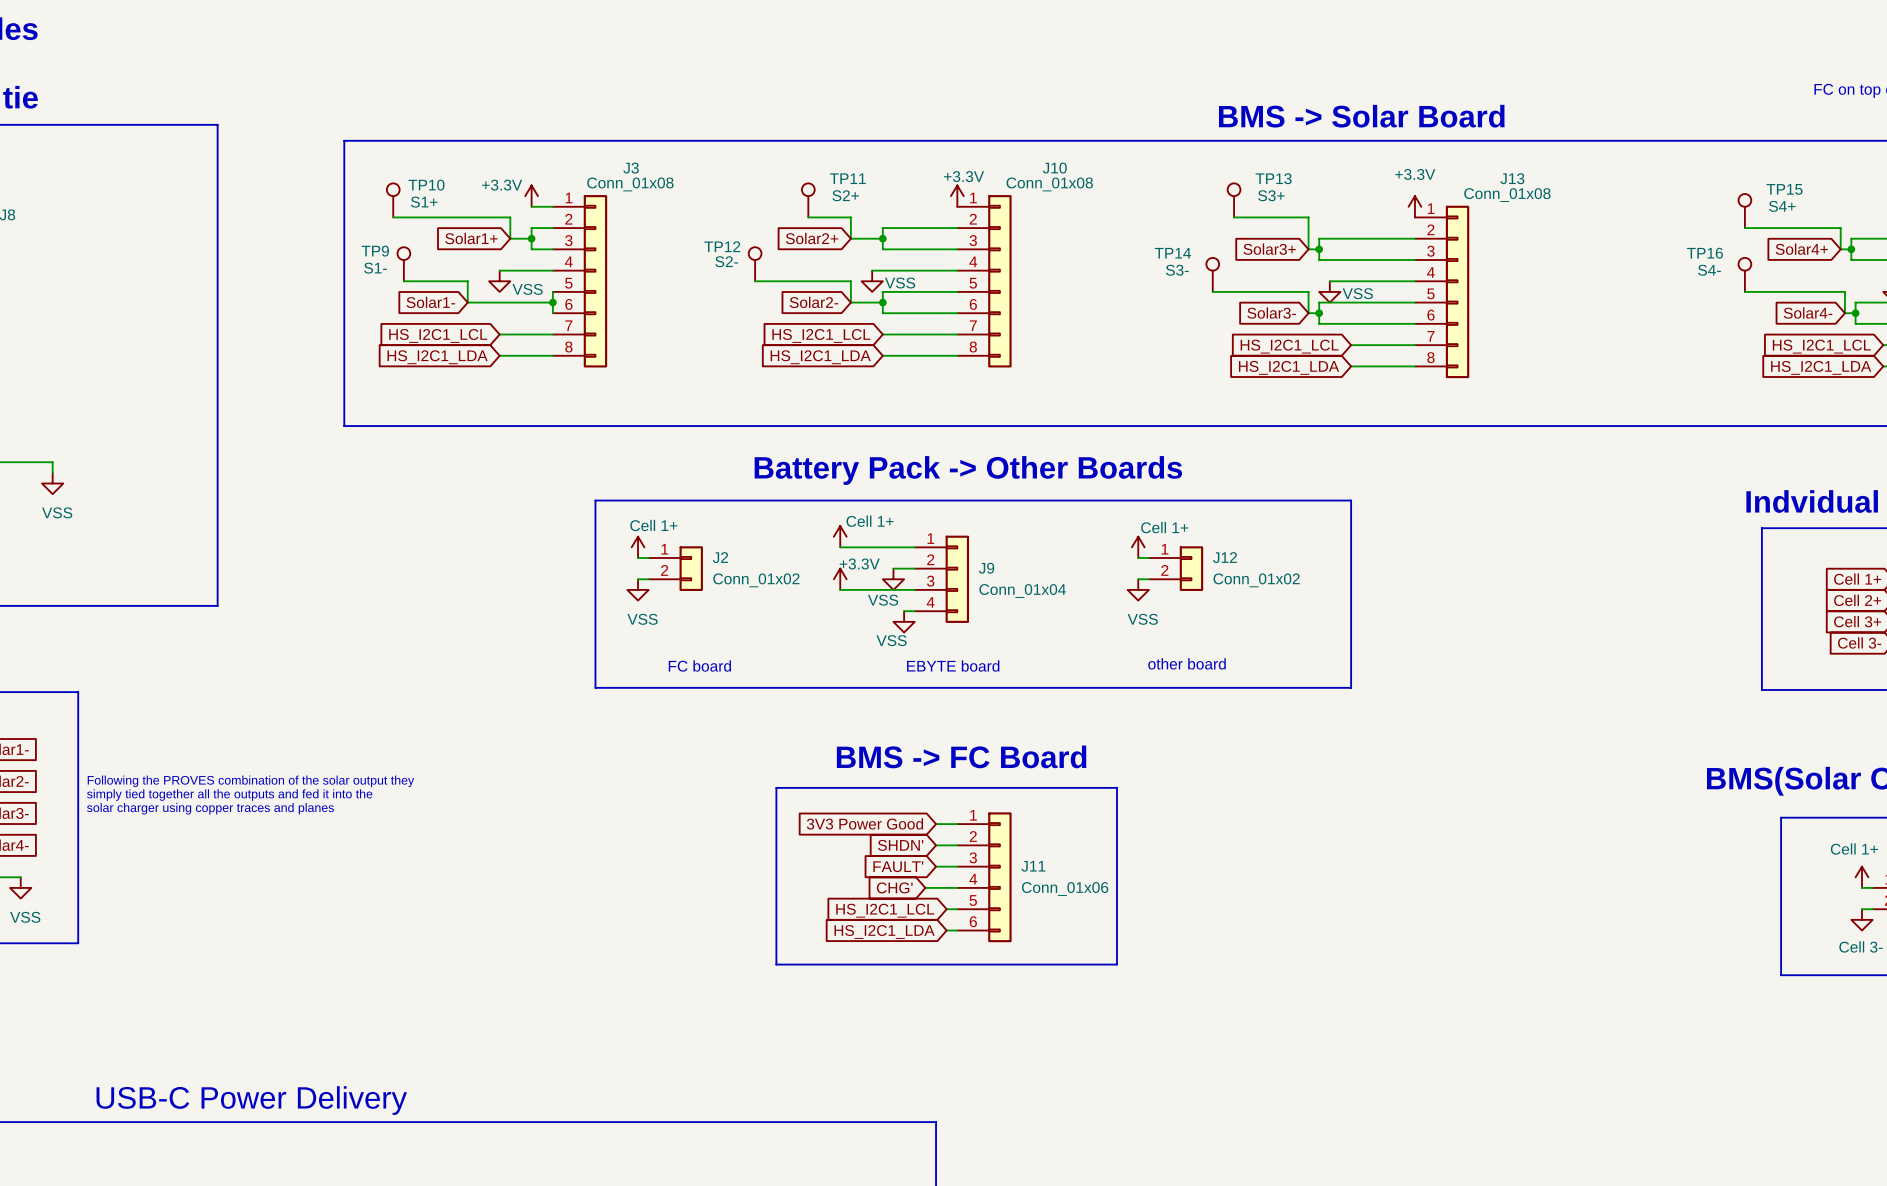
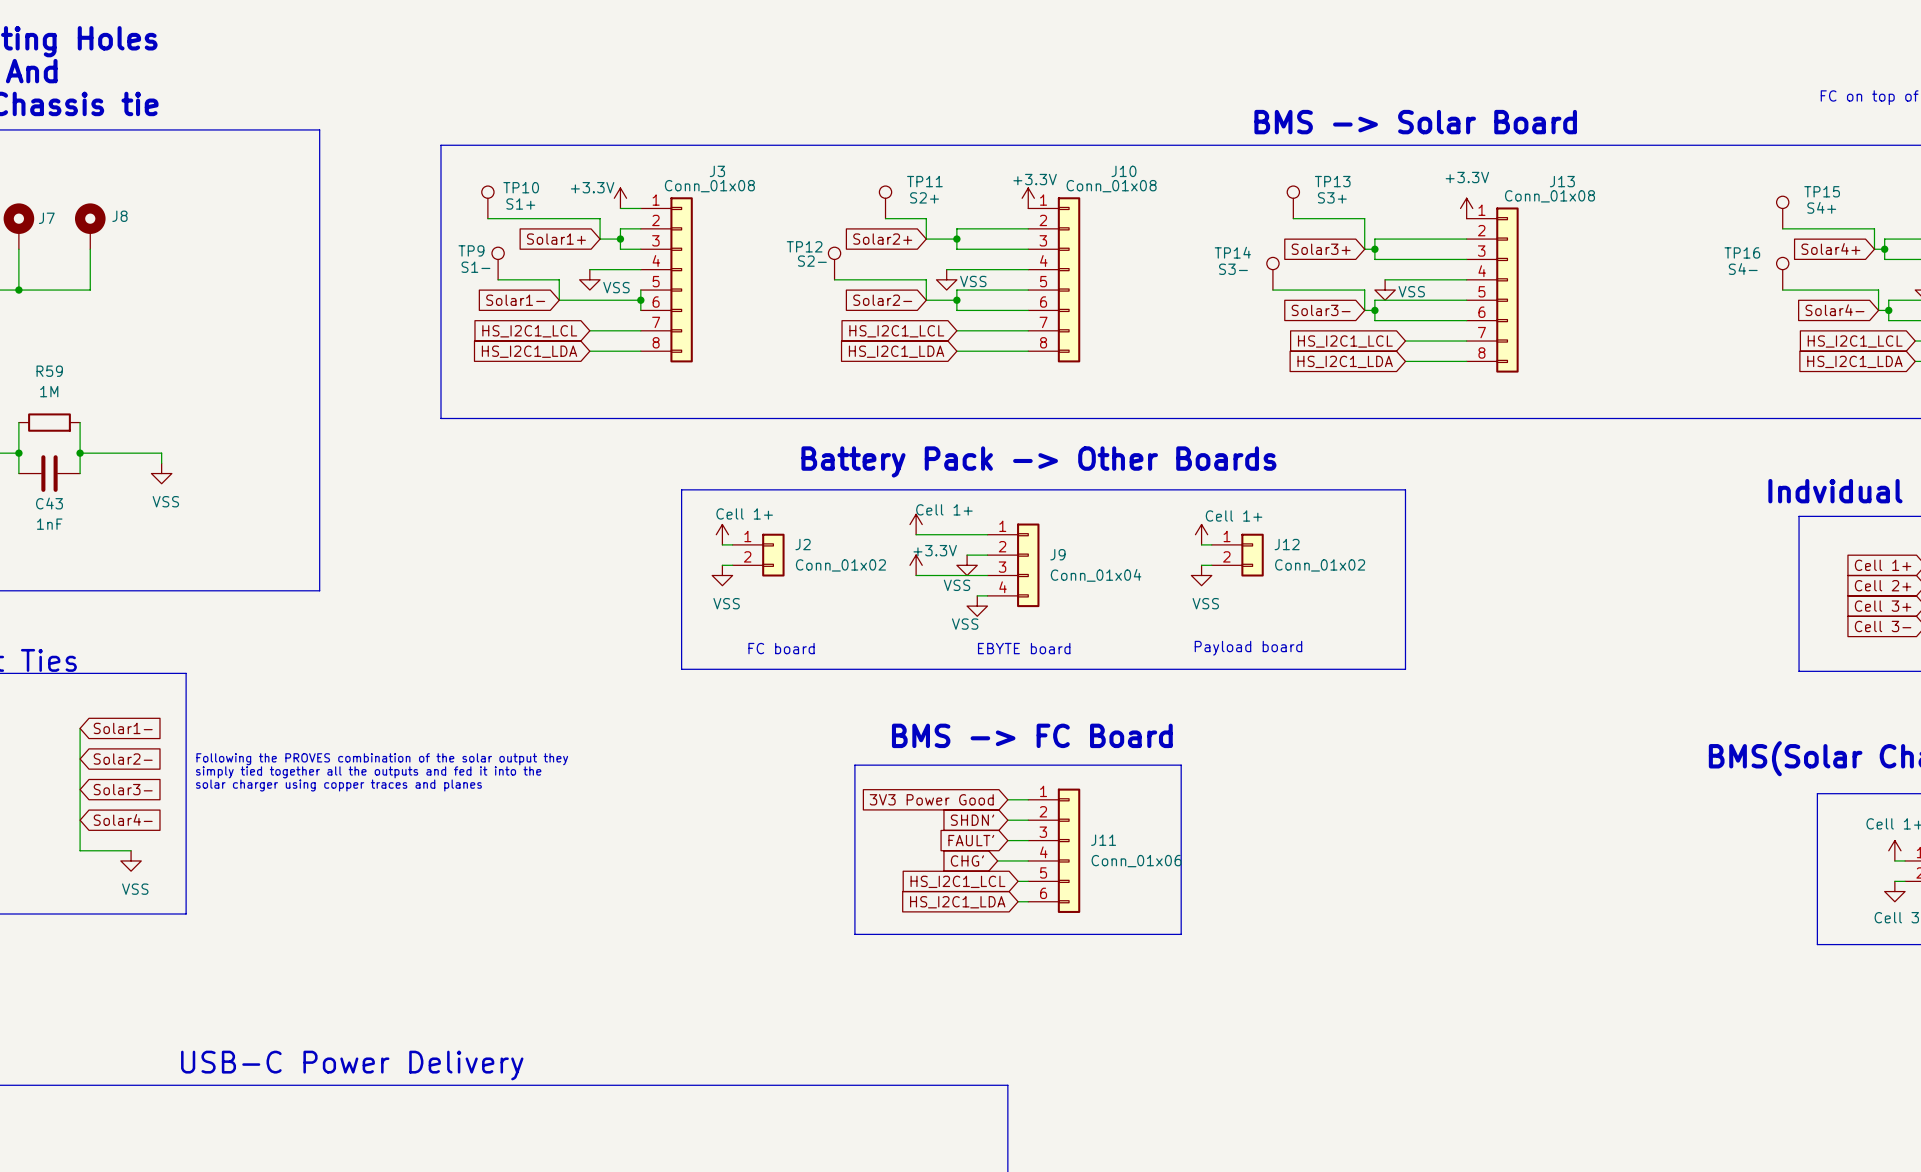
text: other board (1187, 663) -> Payload board (1248, 648)

